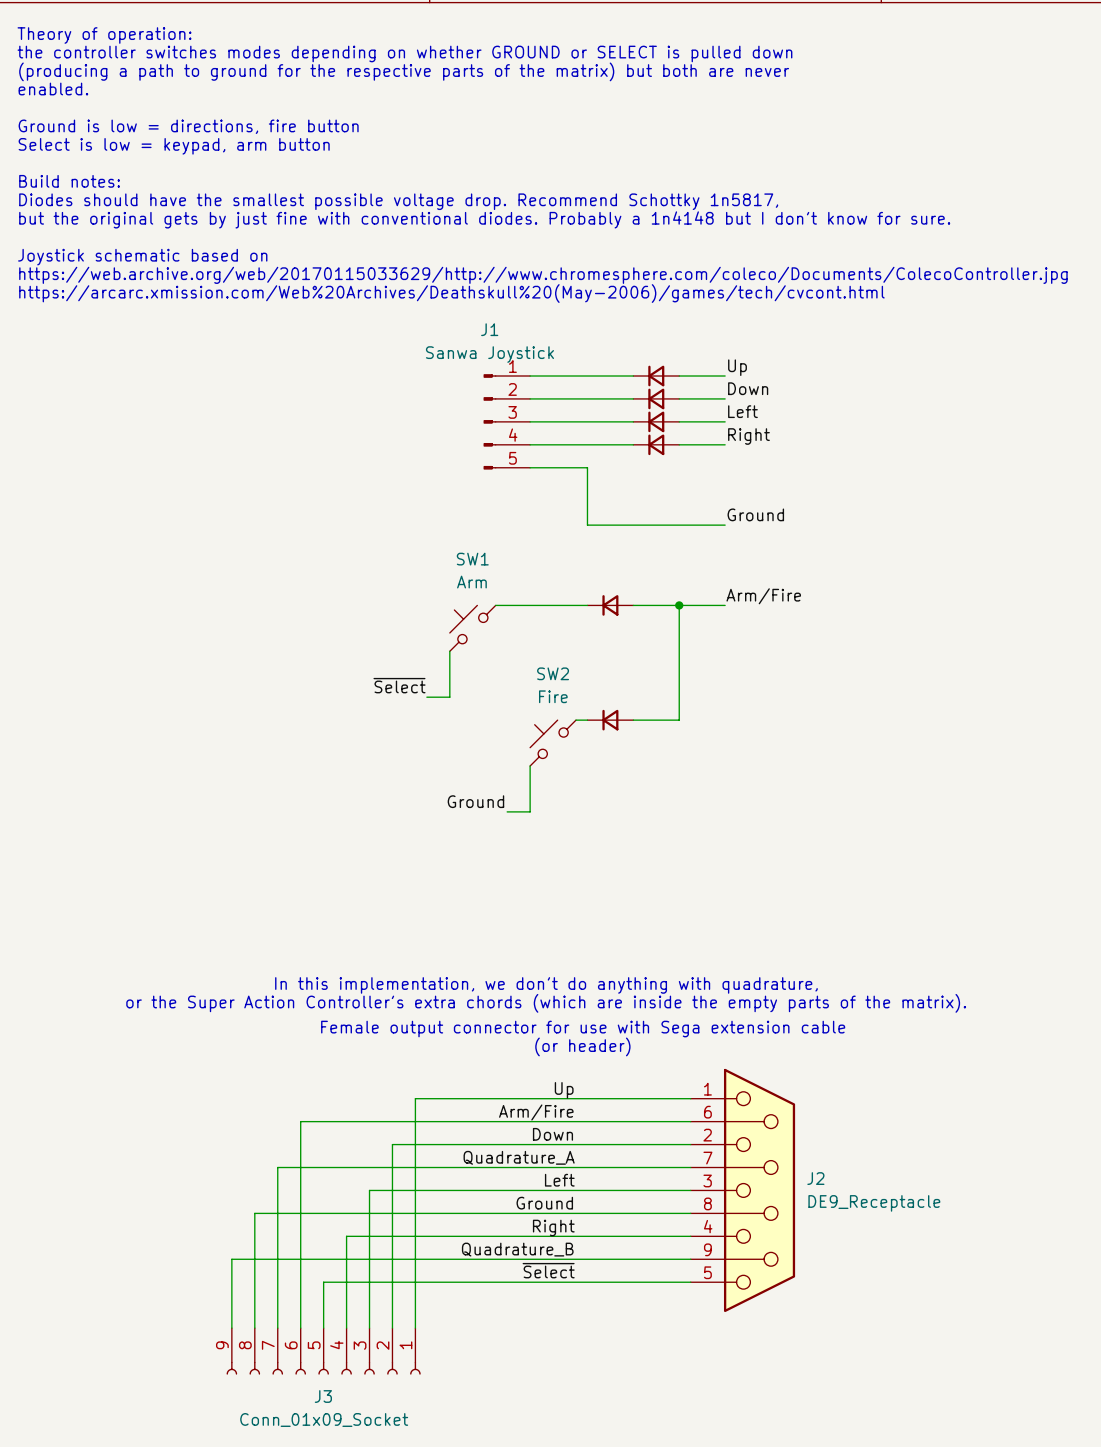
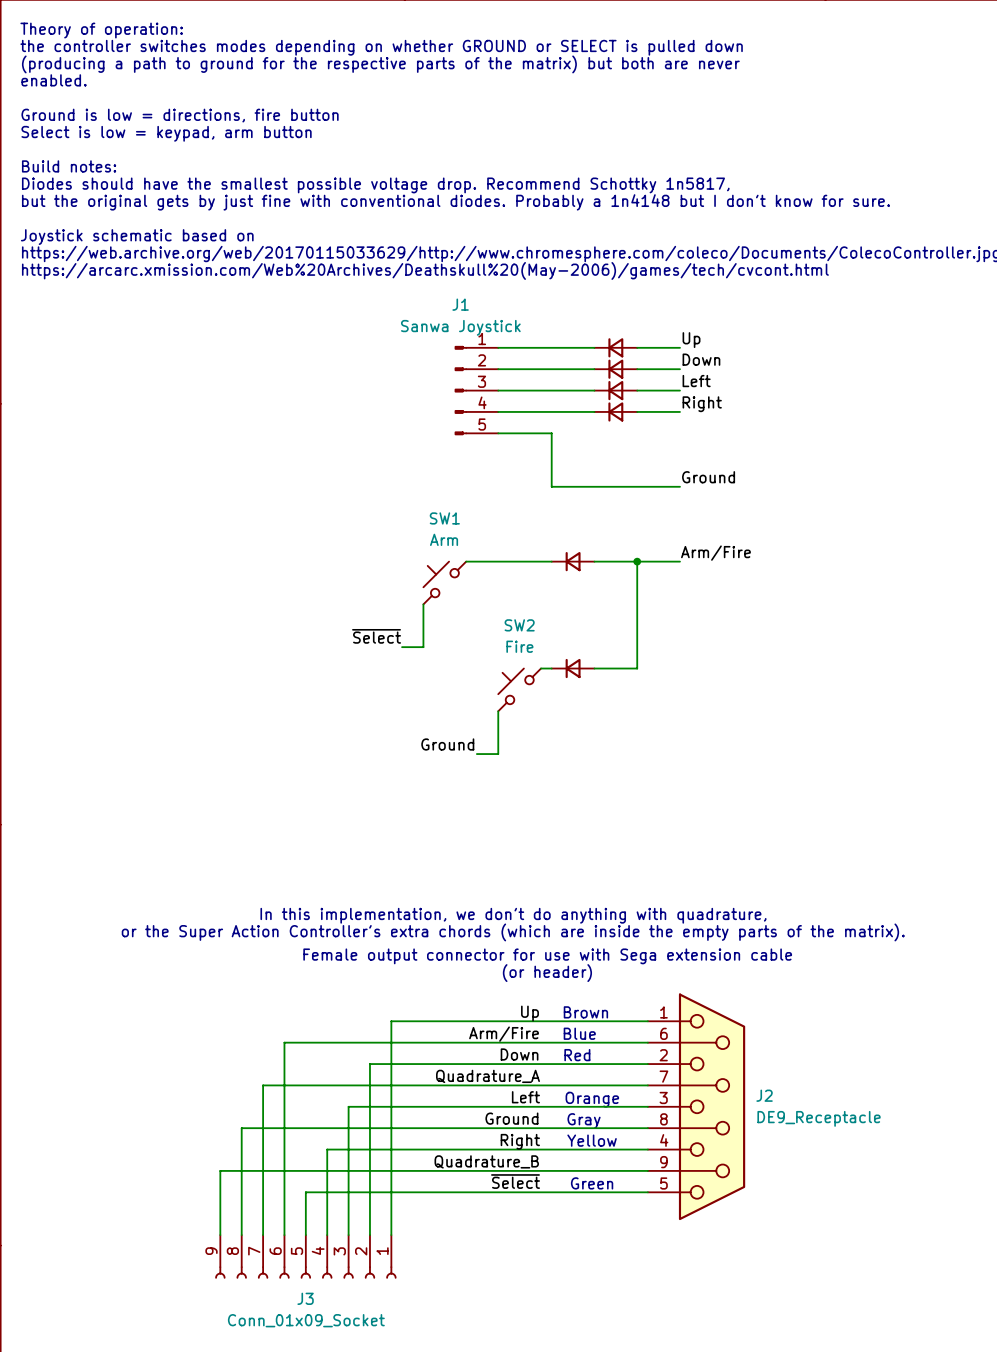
text: none -> Brown (585, 1012)
text: none -> Blue (579, 1033)
text: none -> Red (577, 1055)
text: none -> Orange (592, 1099)
text: none -> Gray (584, 1121)
text: none -> Yellow (592, 1140)
text: none -> Green (592, 1183)

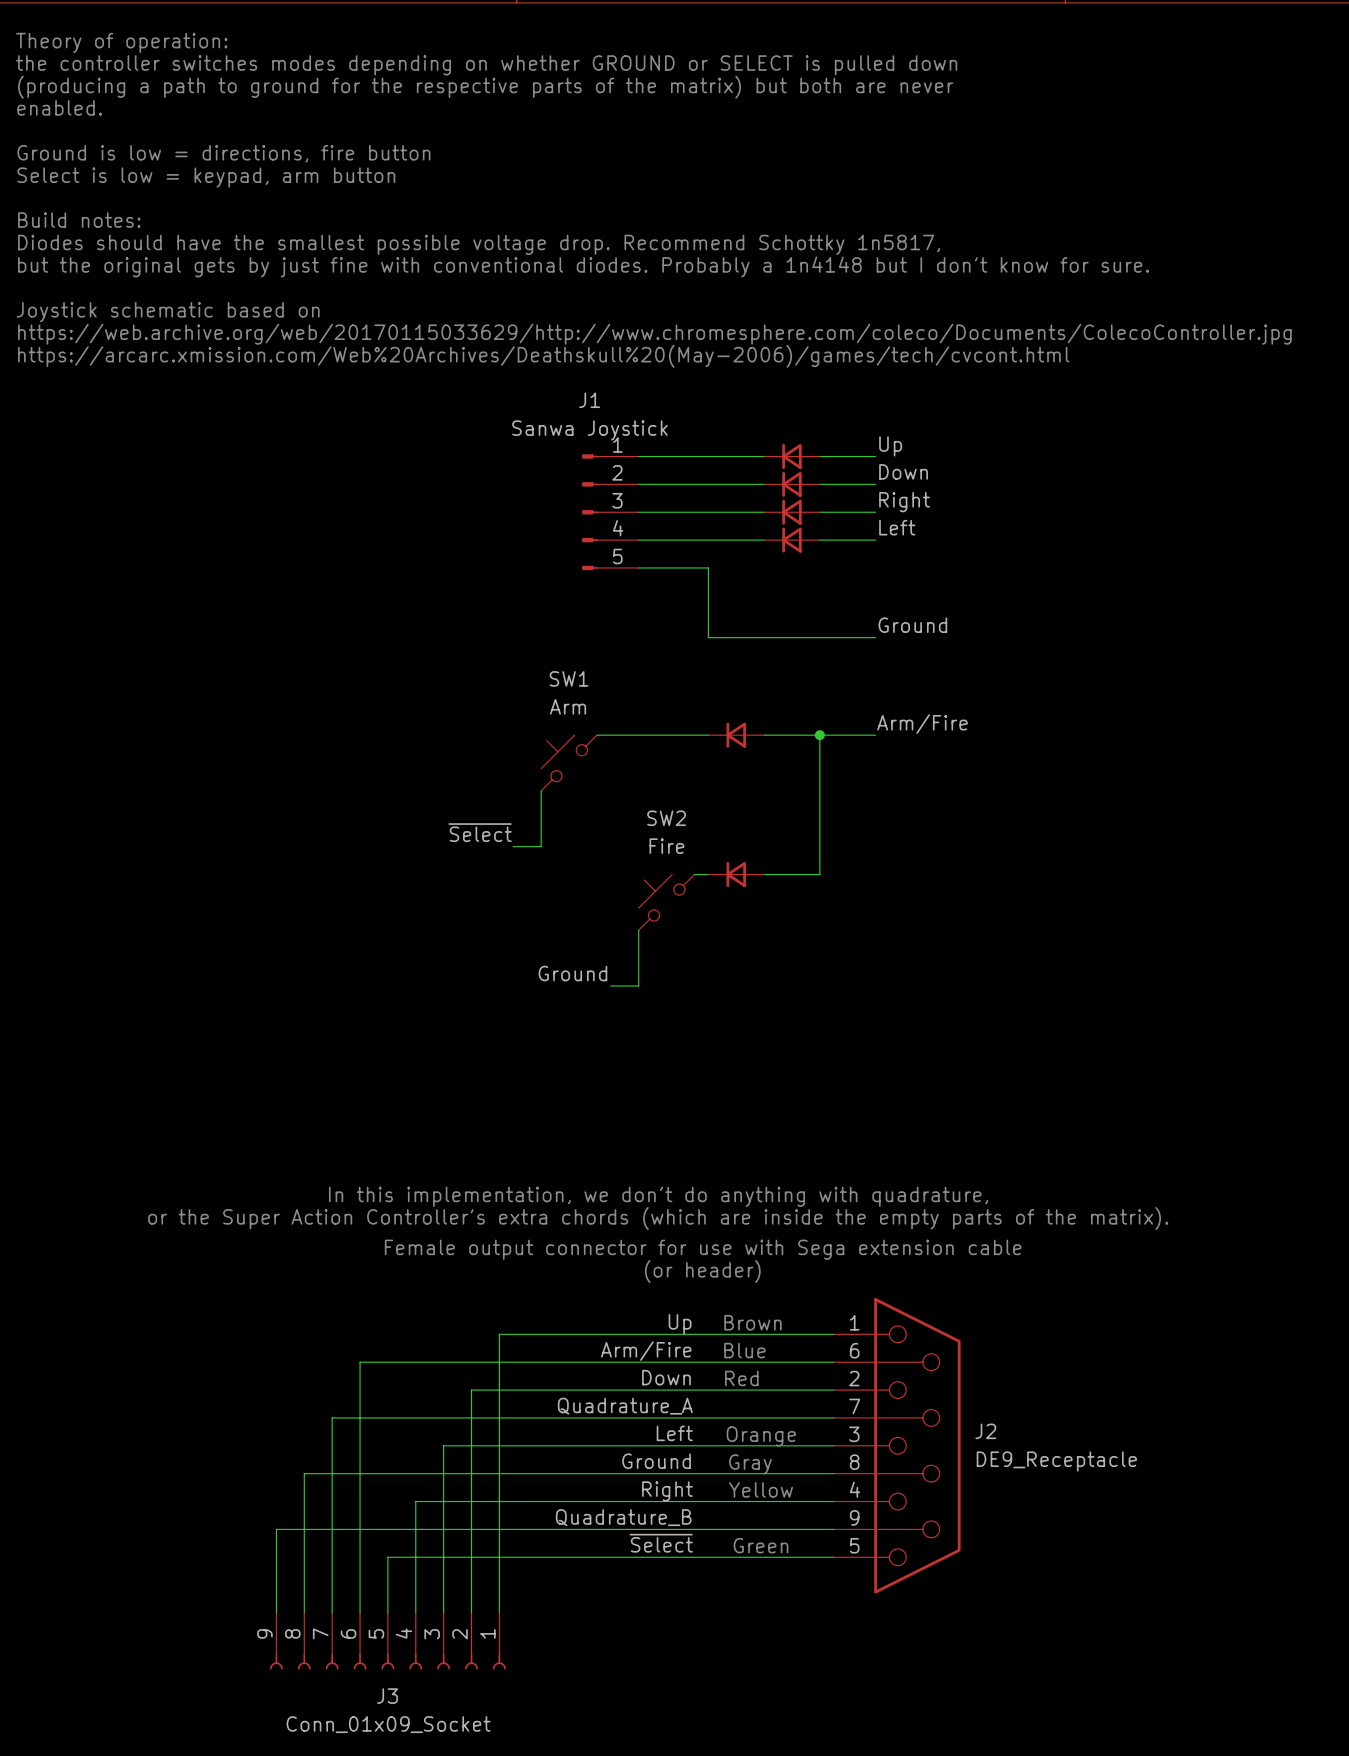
label: Left (696, 381) -> Right (904, 502)
label: Right (702, 404) -> Left (897, 527)

